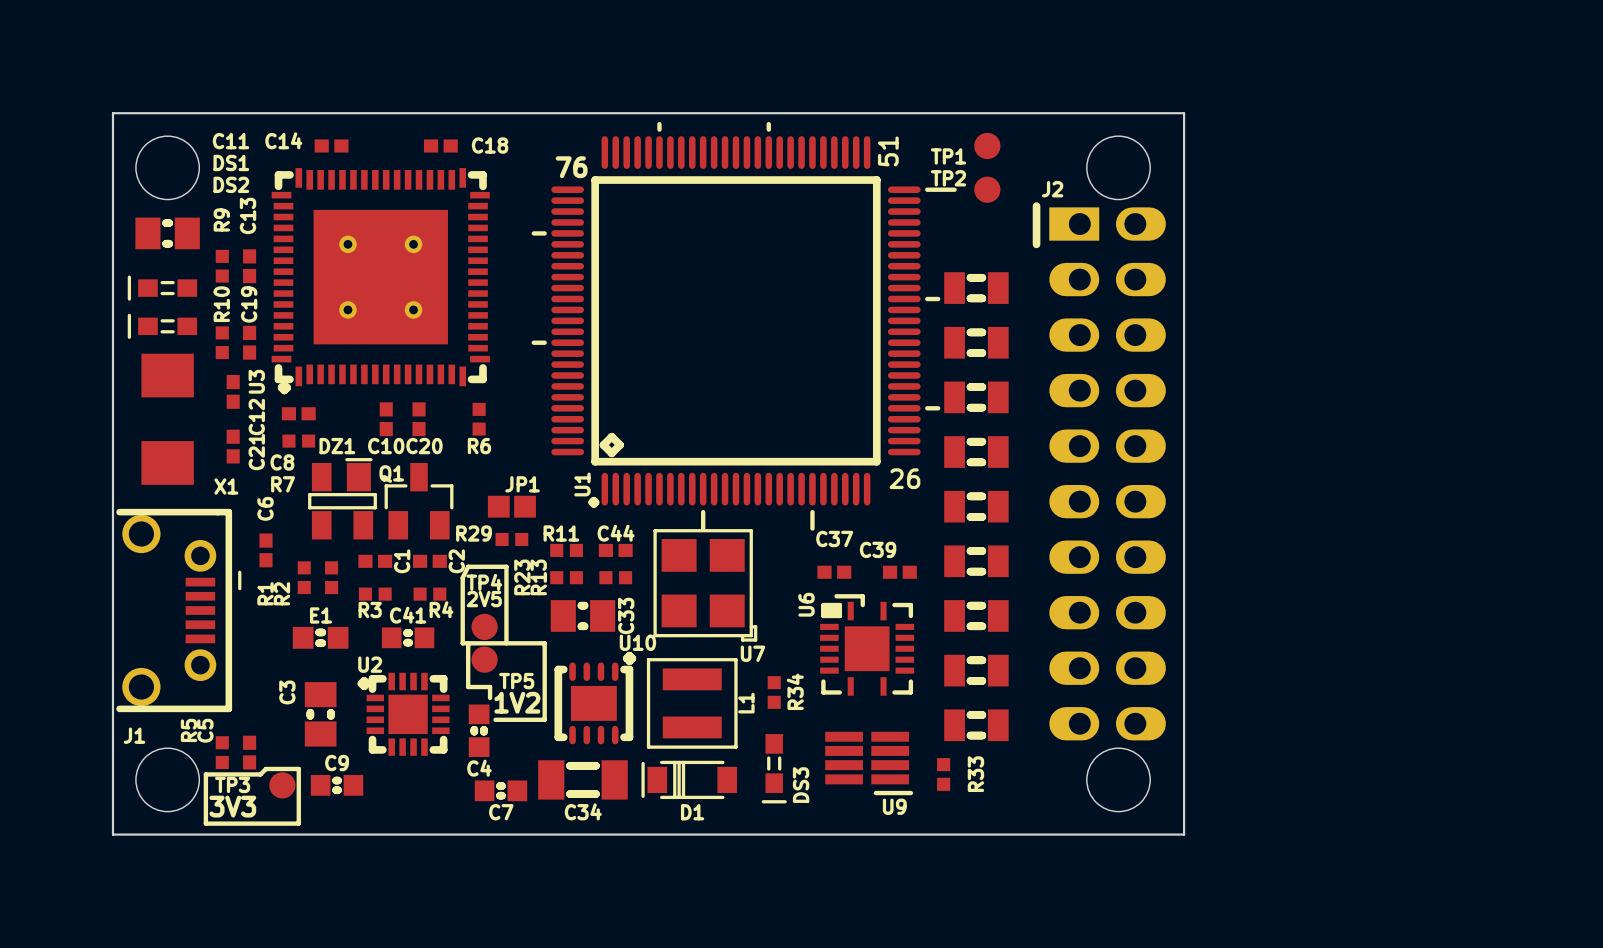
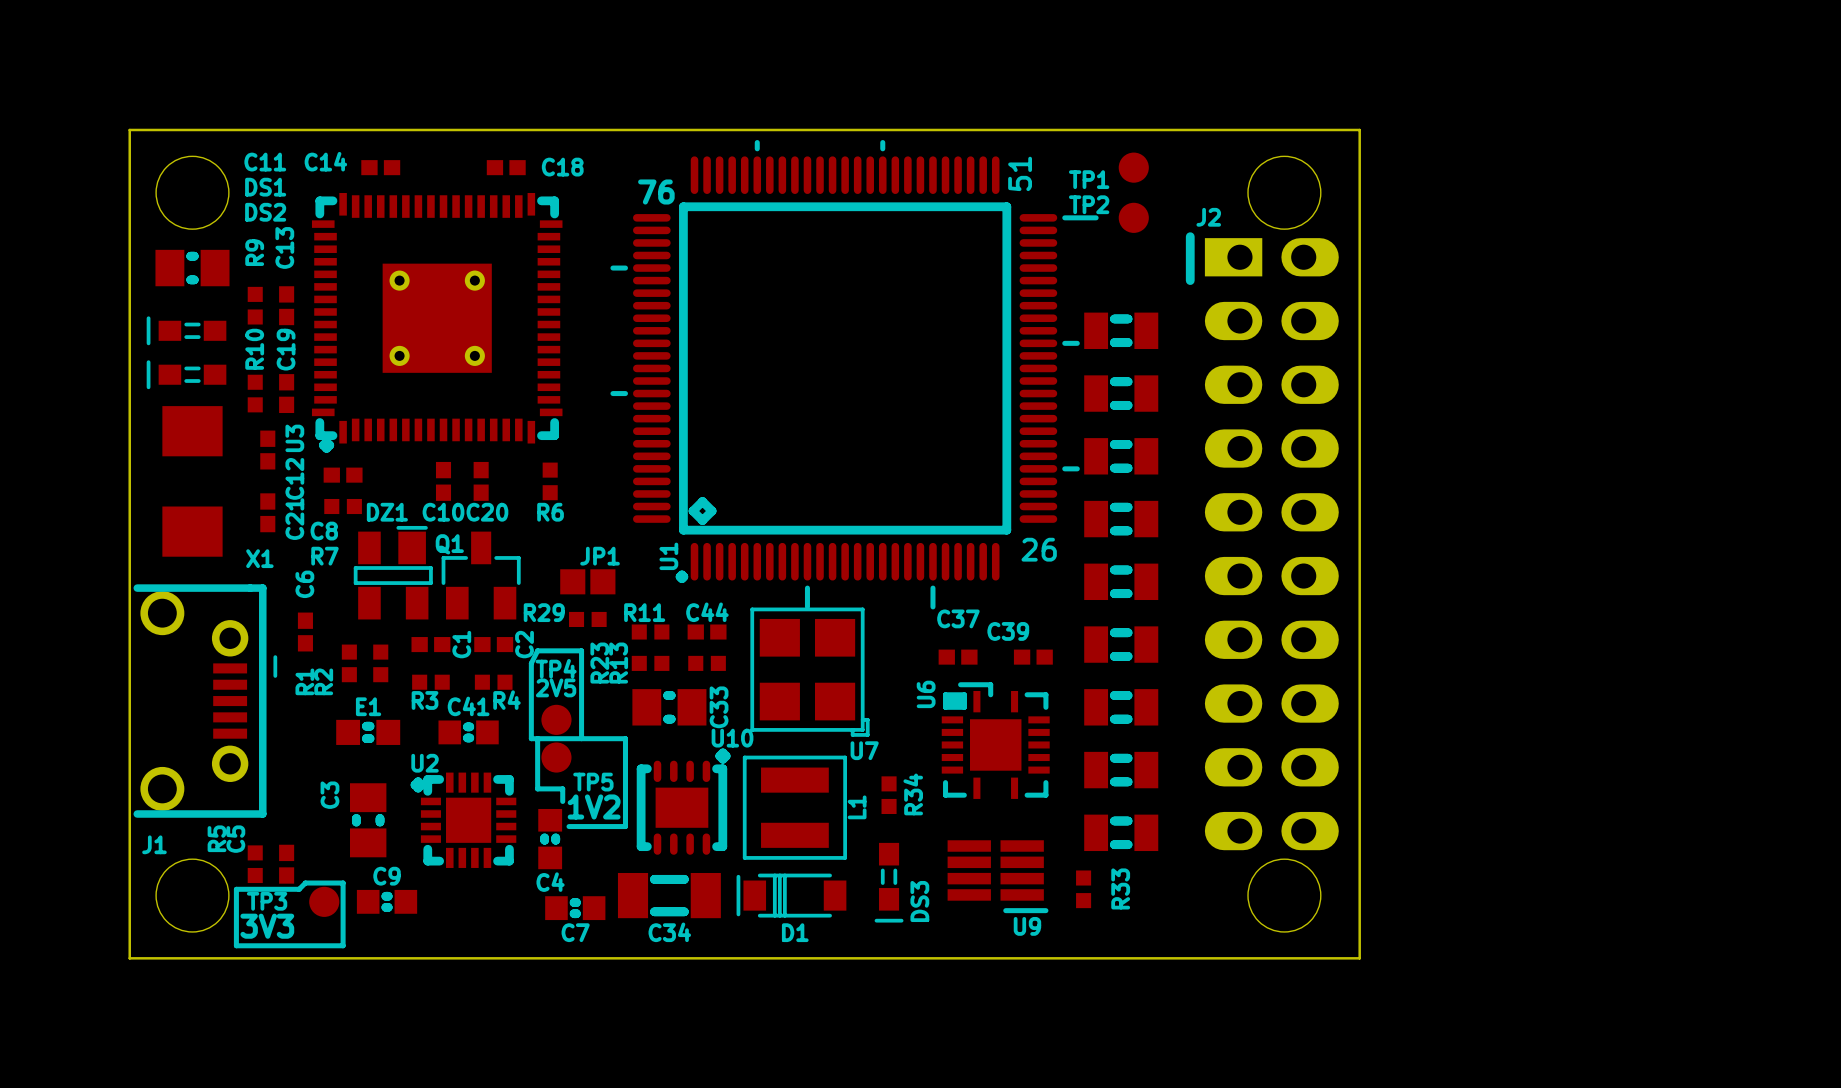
U3 footprint: [271, 168, 490, 395] -> [311, 192, 563, 453]

